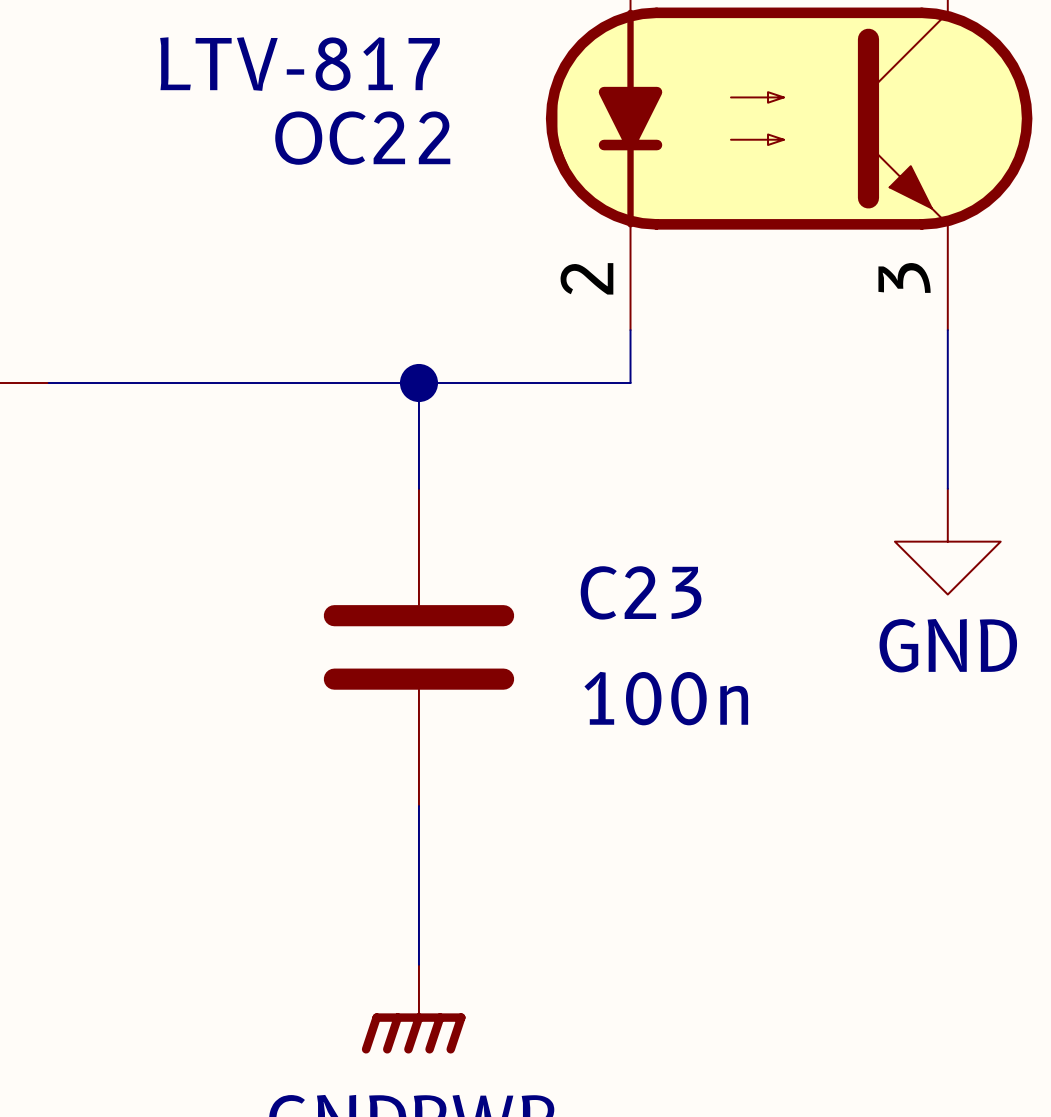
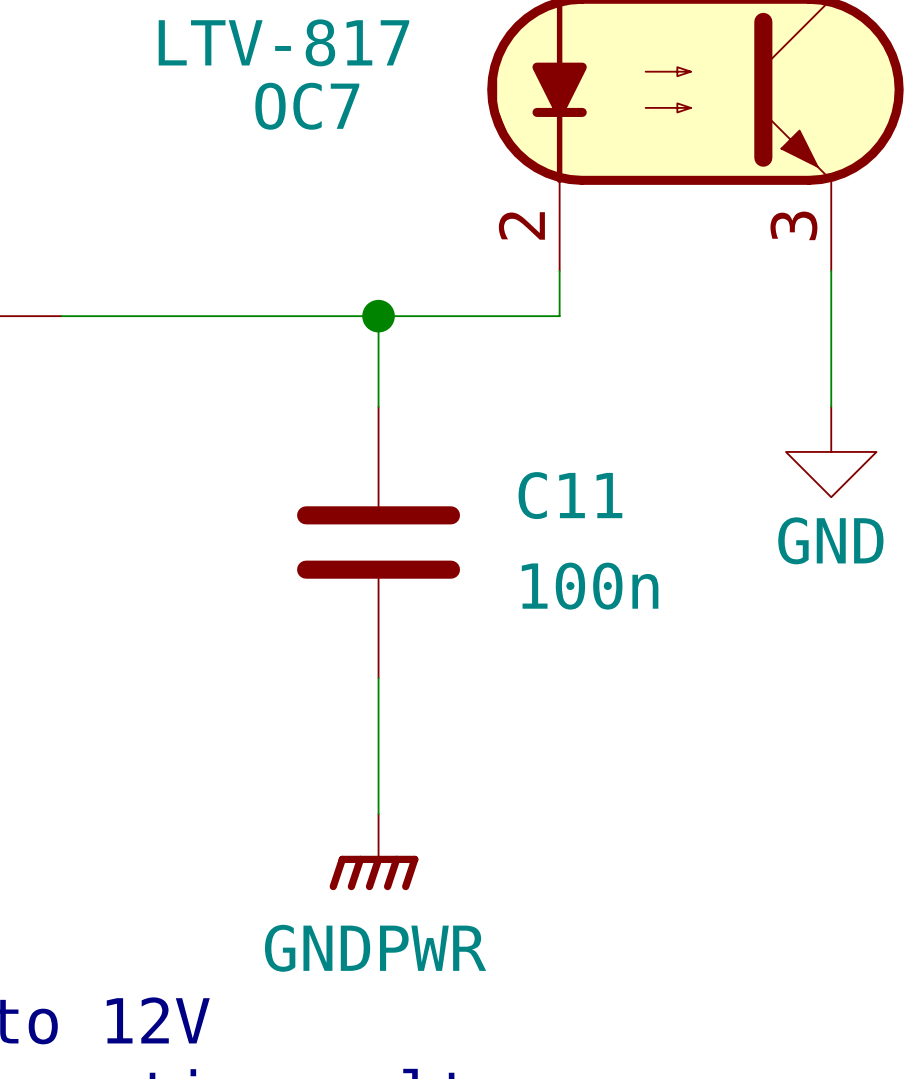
OC22 name: OC22 (362, 138) -> OC7 (307, 106)
C23 name: C23 (641, 592) -> C11 (570, 495)

